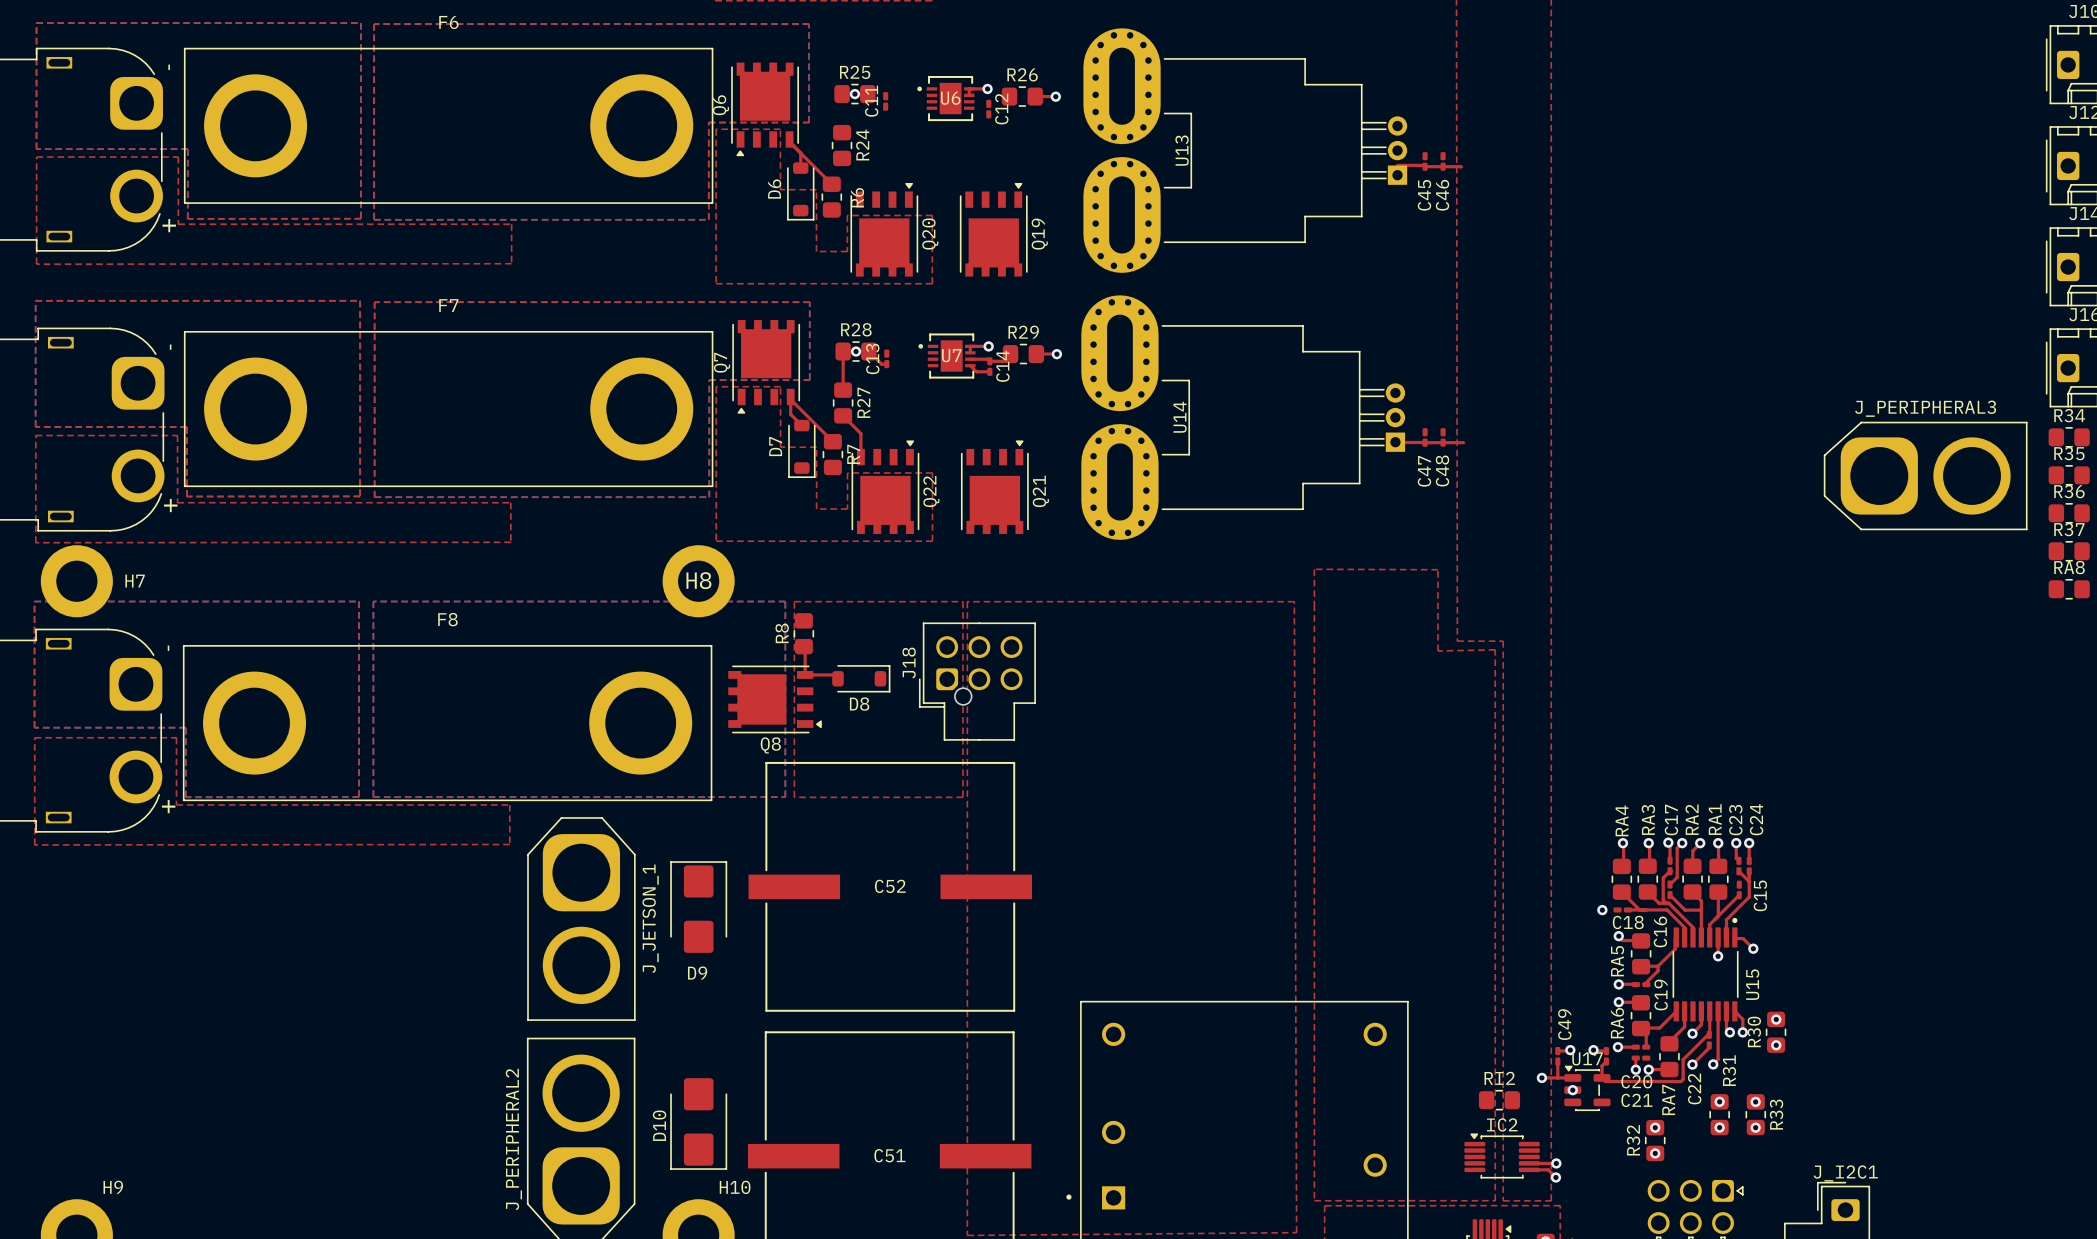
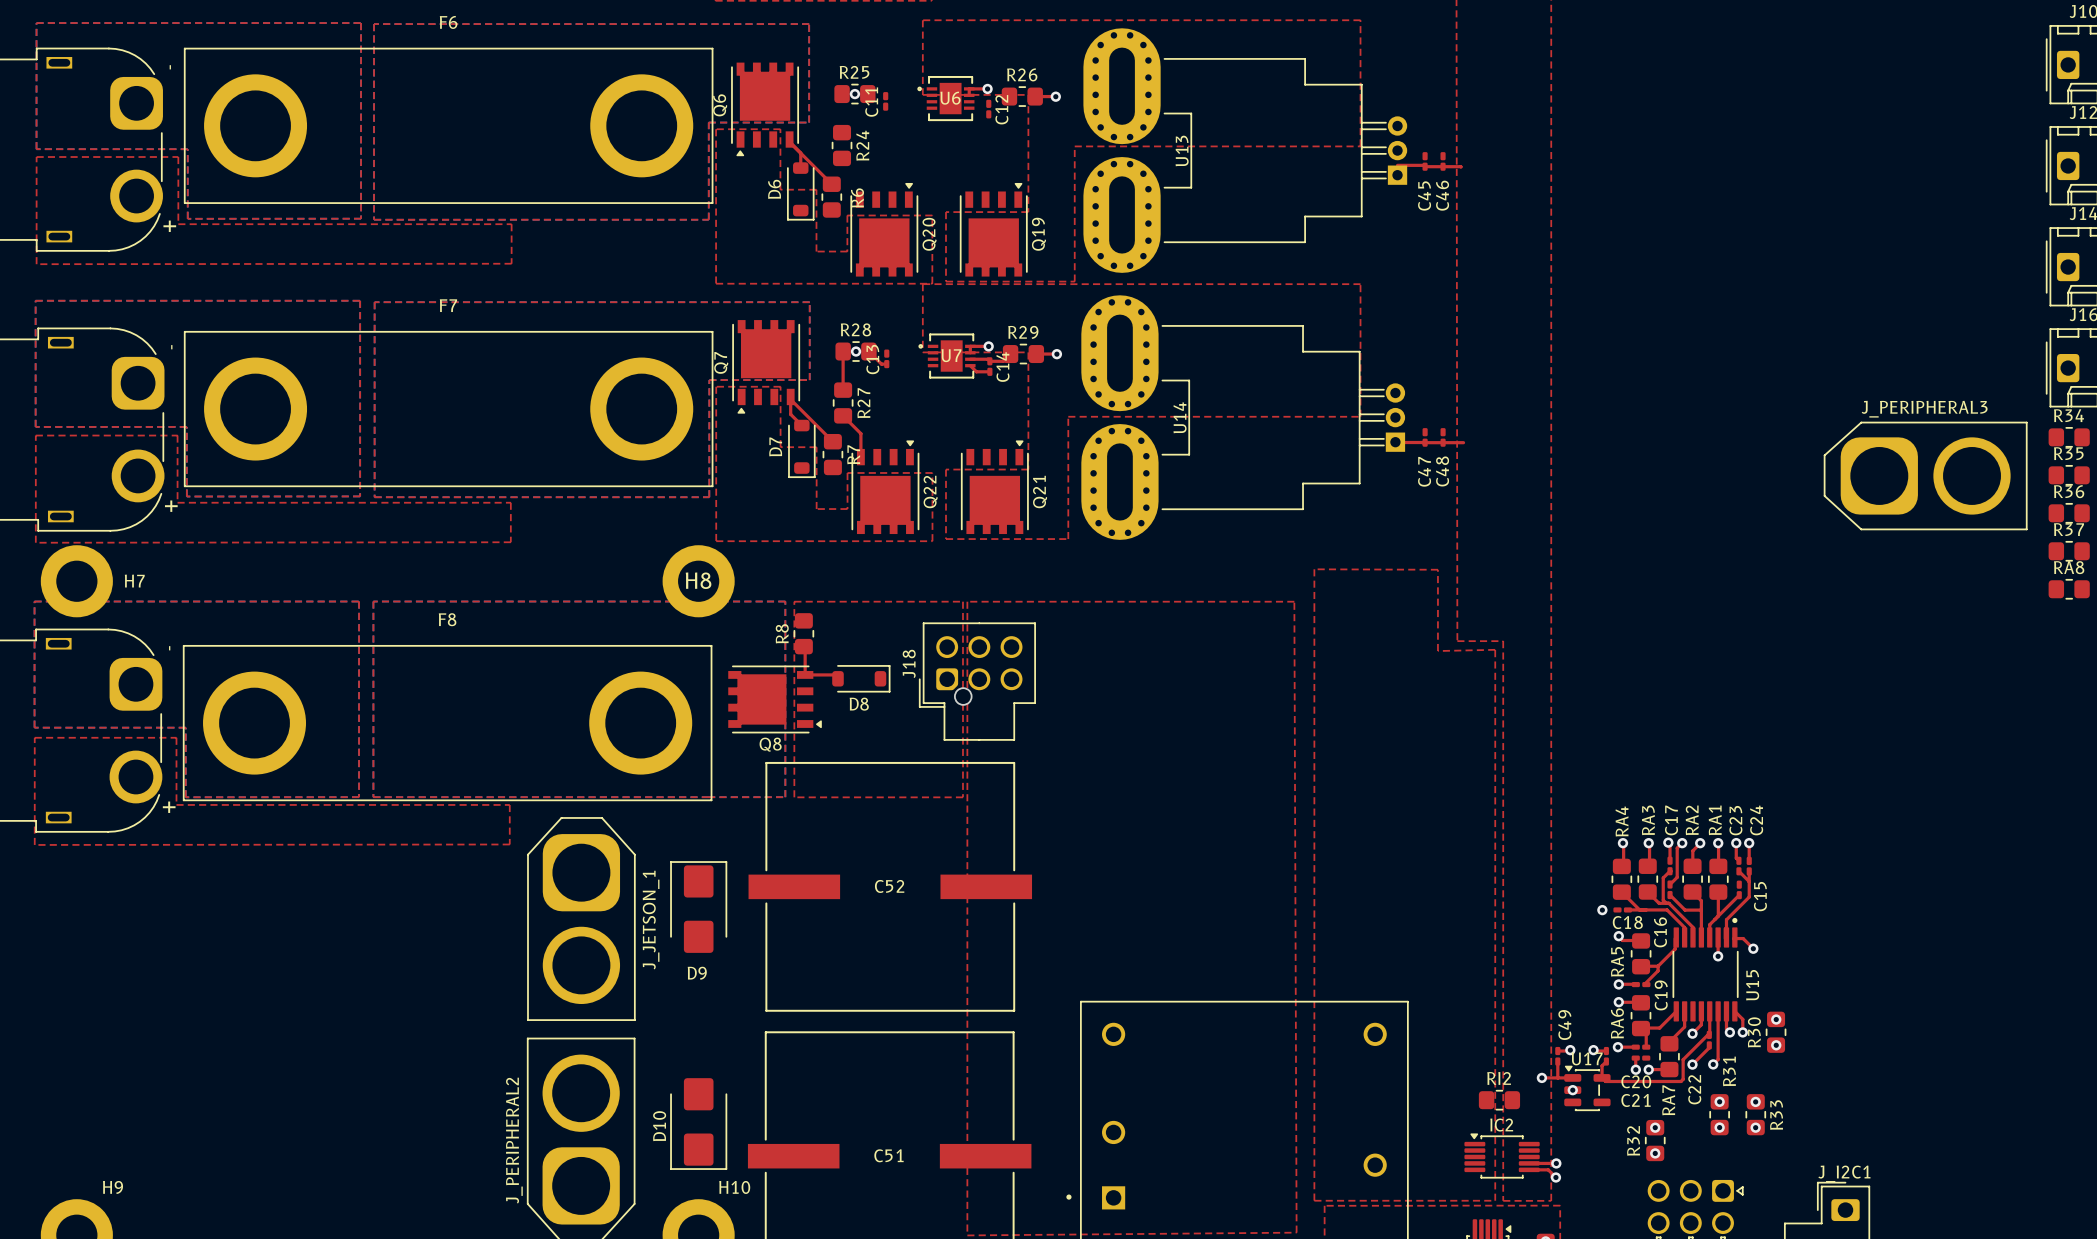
top zone outline: none -> (922, 20) (922, 94) (1028, 94) (1028, 212) (946, 212) (946, 281) (1074, 281) (1074, 146) (1360, 146) (1360, 20) (922, 20)
top zone outline: none -> (922, 284) (1360, 284) (1360, 416) (1068, 416) (1068, 539) (946, 539) (946, 469) (1028, 469) (1028, 352) (922, 352) (922, 284)

